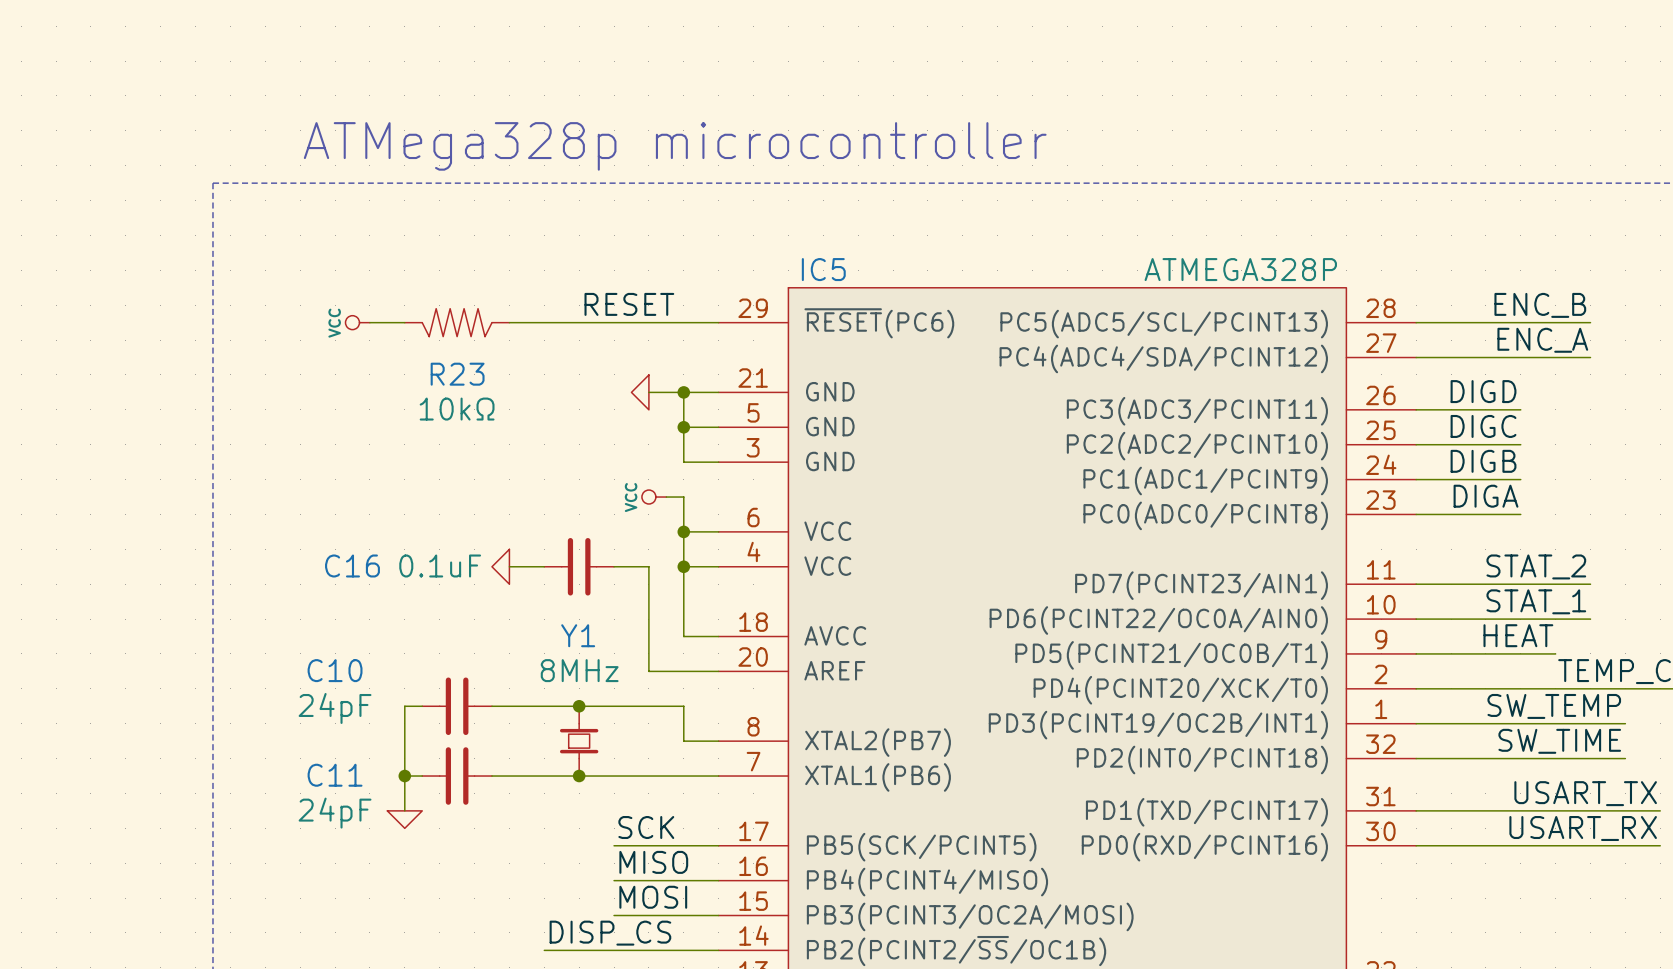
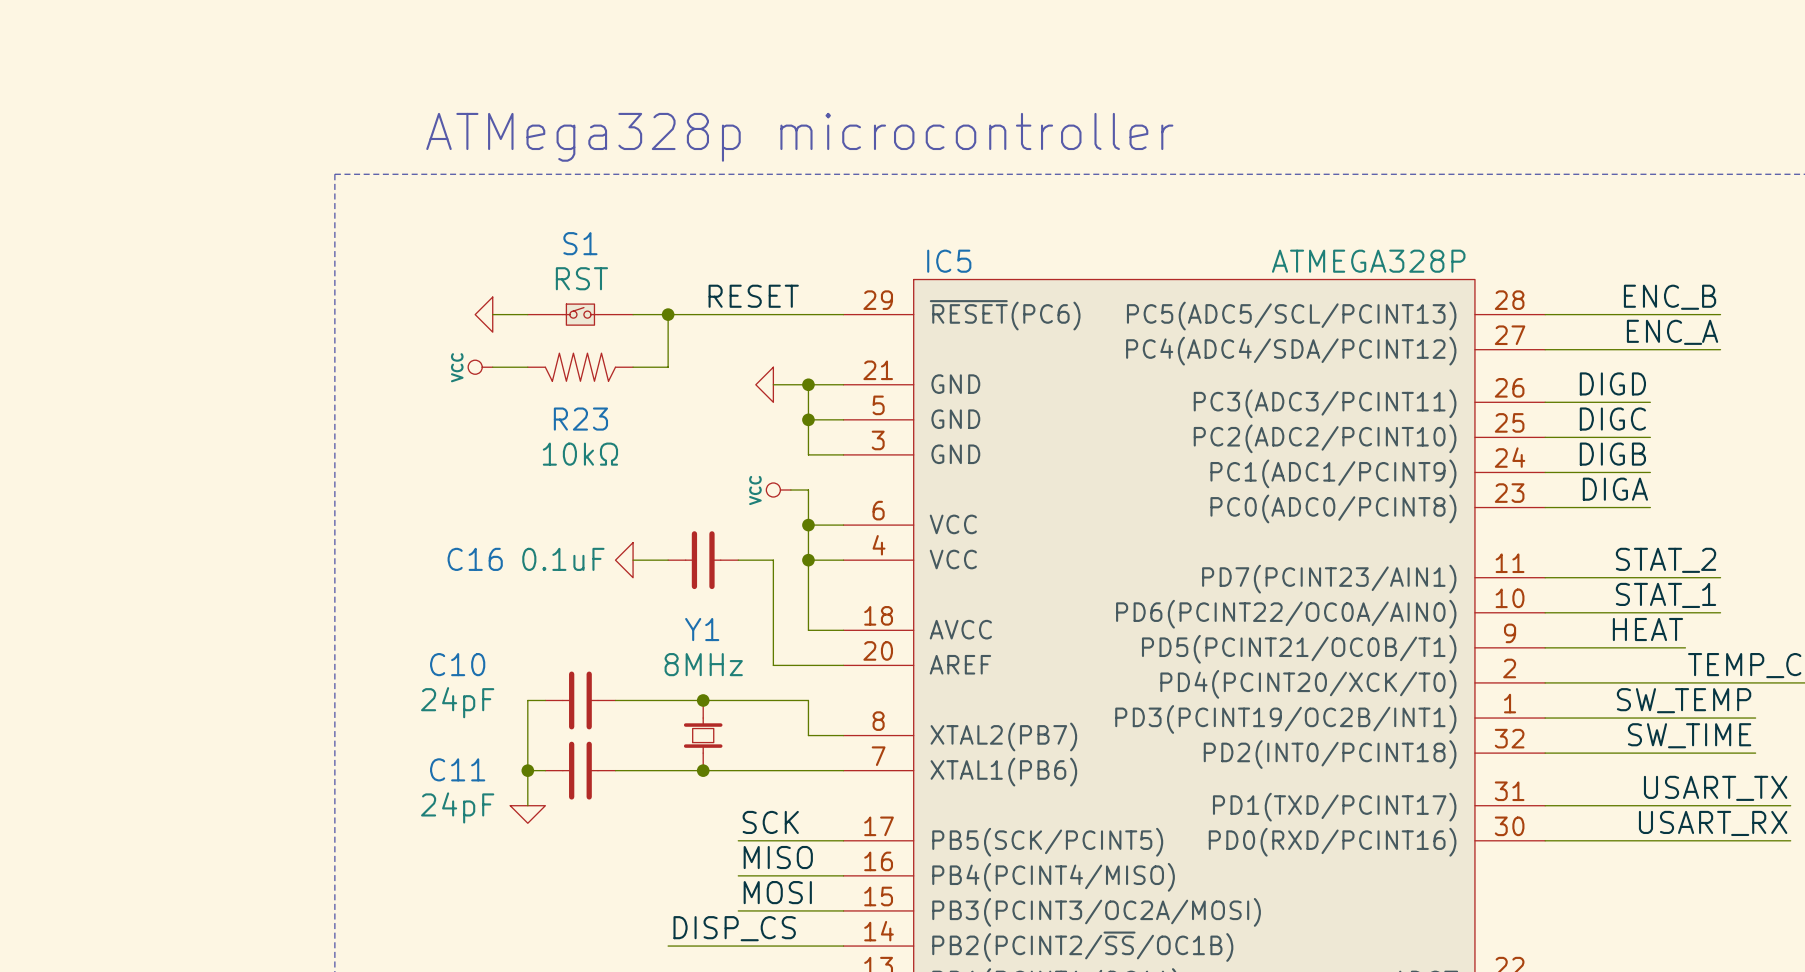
power symbol shape: [345, 315, 370, 330] -> [475, 297, 493, 333]
R23 position: (457, 322) -> (580, 367)
S1: none -> RST (580, 314)
wire: none -> (668, 314) (668, 367) (633, 367)
junction: none -> (668, 314)
power symbol text: VCC (334, 323) -> none
power symbol: none -> VCC (480, 367)
wire: none -> (492, 367) (527, 367)

